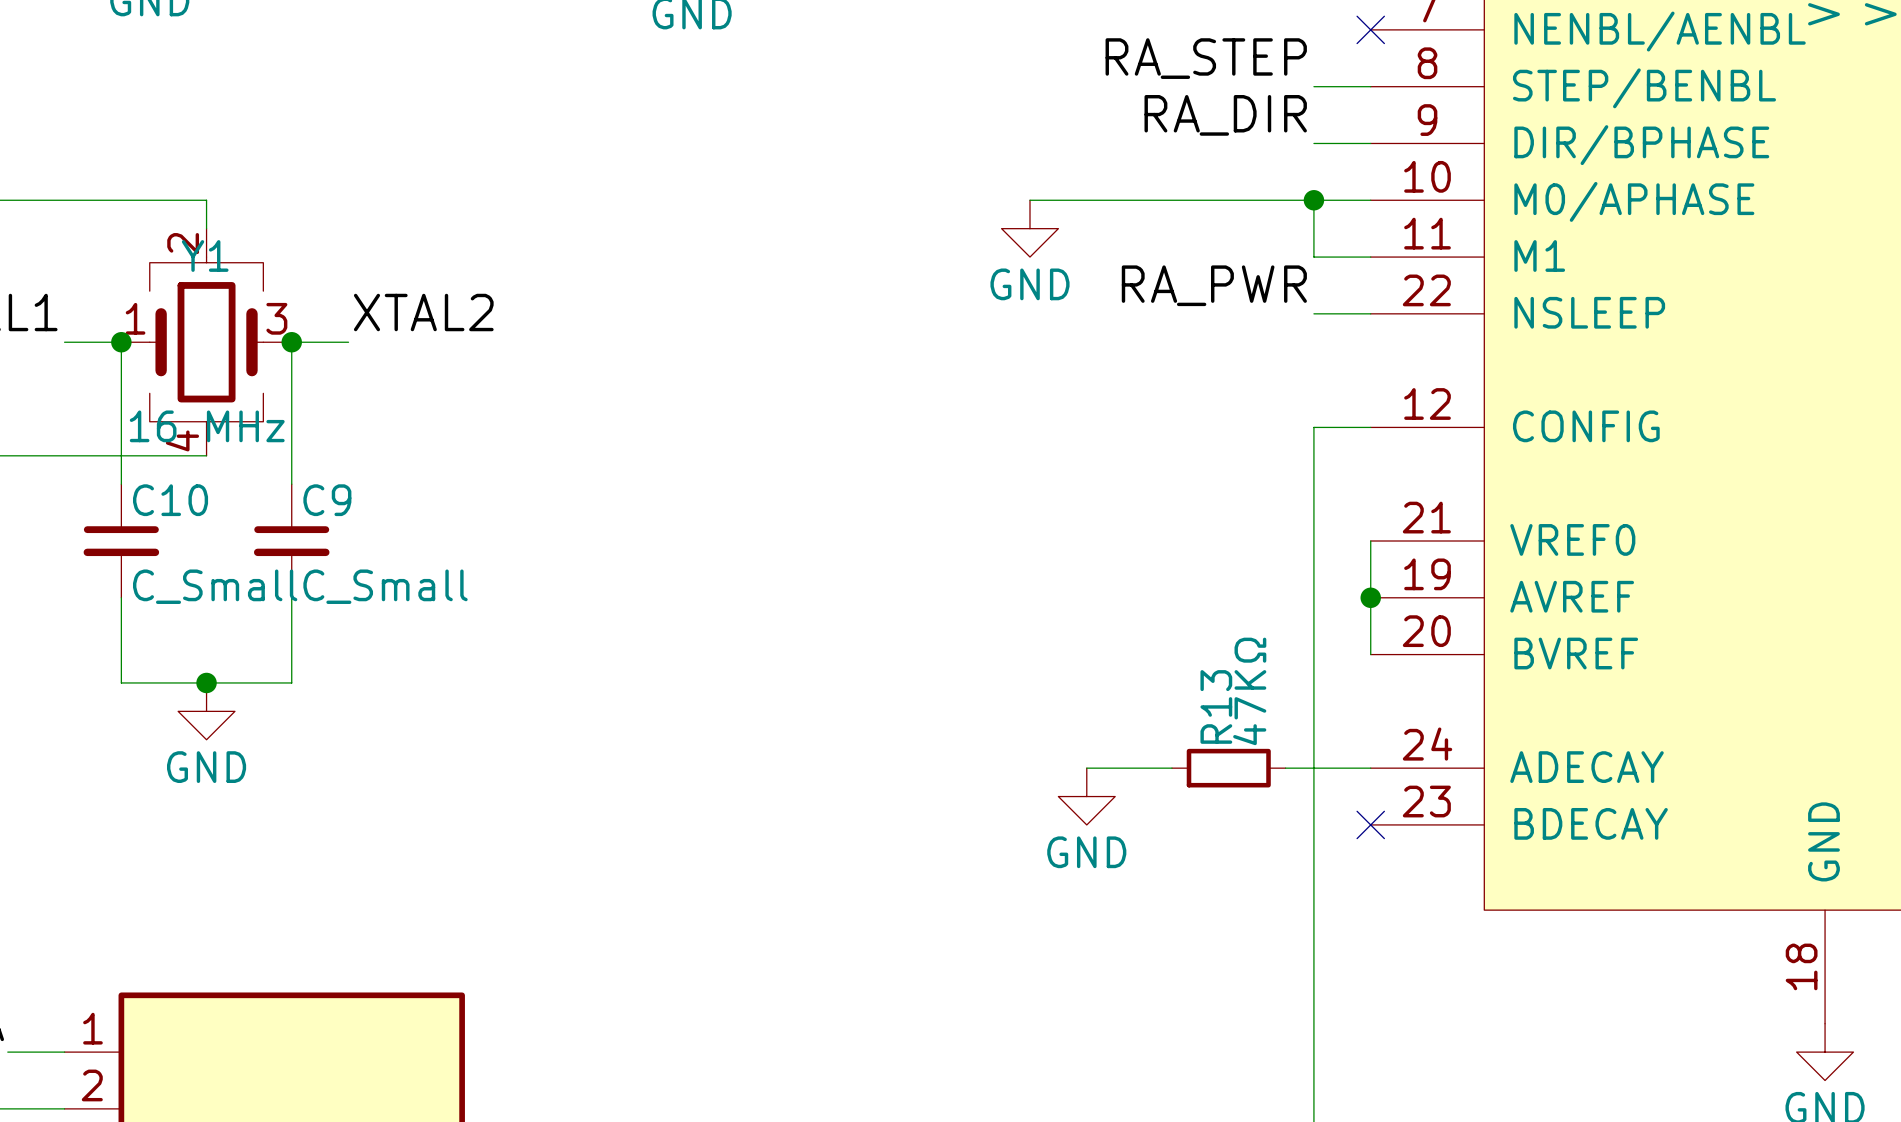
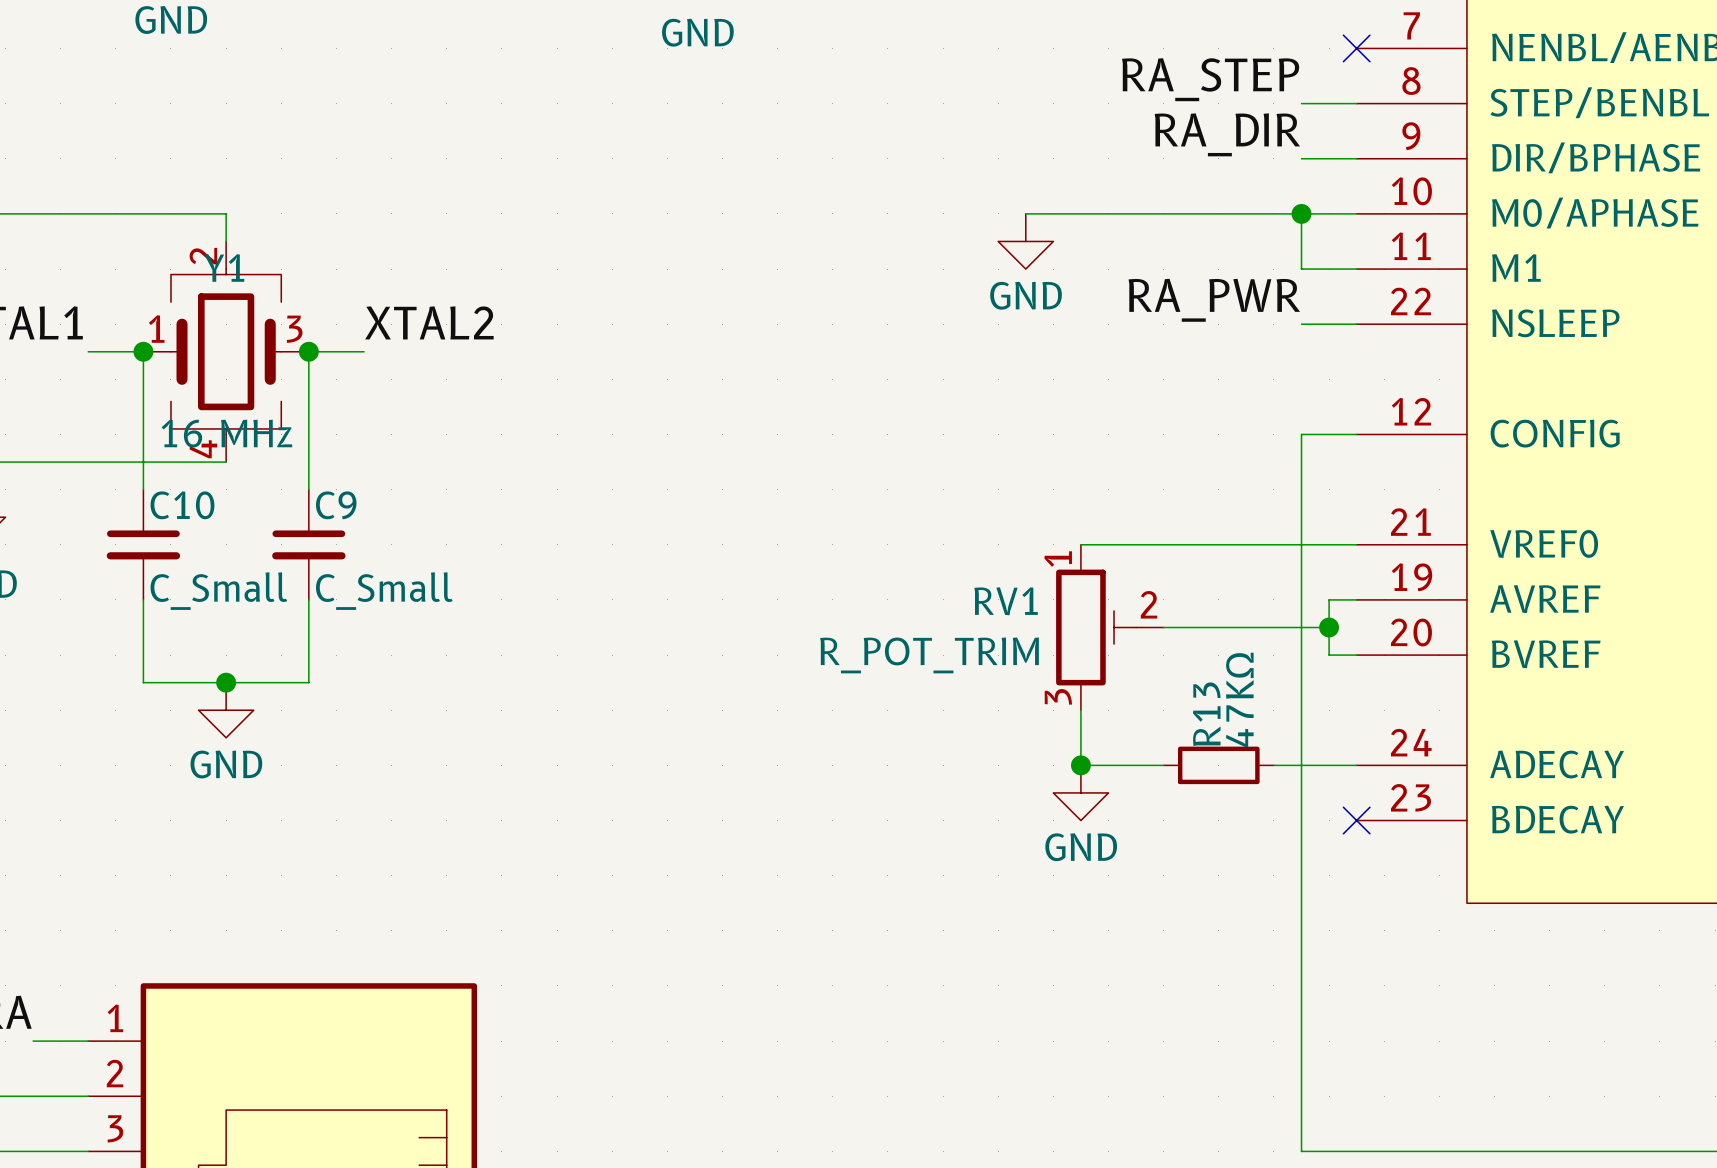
wire: none -> (1080, 544) (1356, 544)
wire: (1370, 541) (1370, 654) -> (1356, 599) (1329, 599) (1329, 655) (1356, 655)
junction position: (1370, 597) -> (1329, 627)
RV1: none -> R_POT_TRIM (1109, 627)
wire: none -> (1163, 627) (1329, 627)
wire: none -> (1080, 710) (1080, 765)
junction: none -> (1080, 765)

